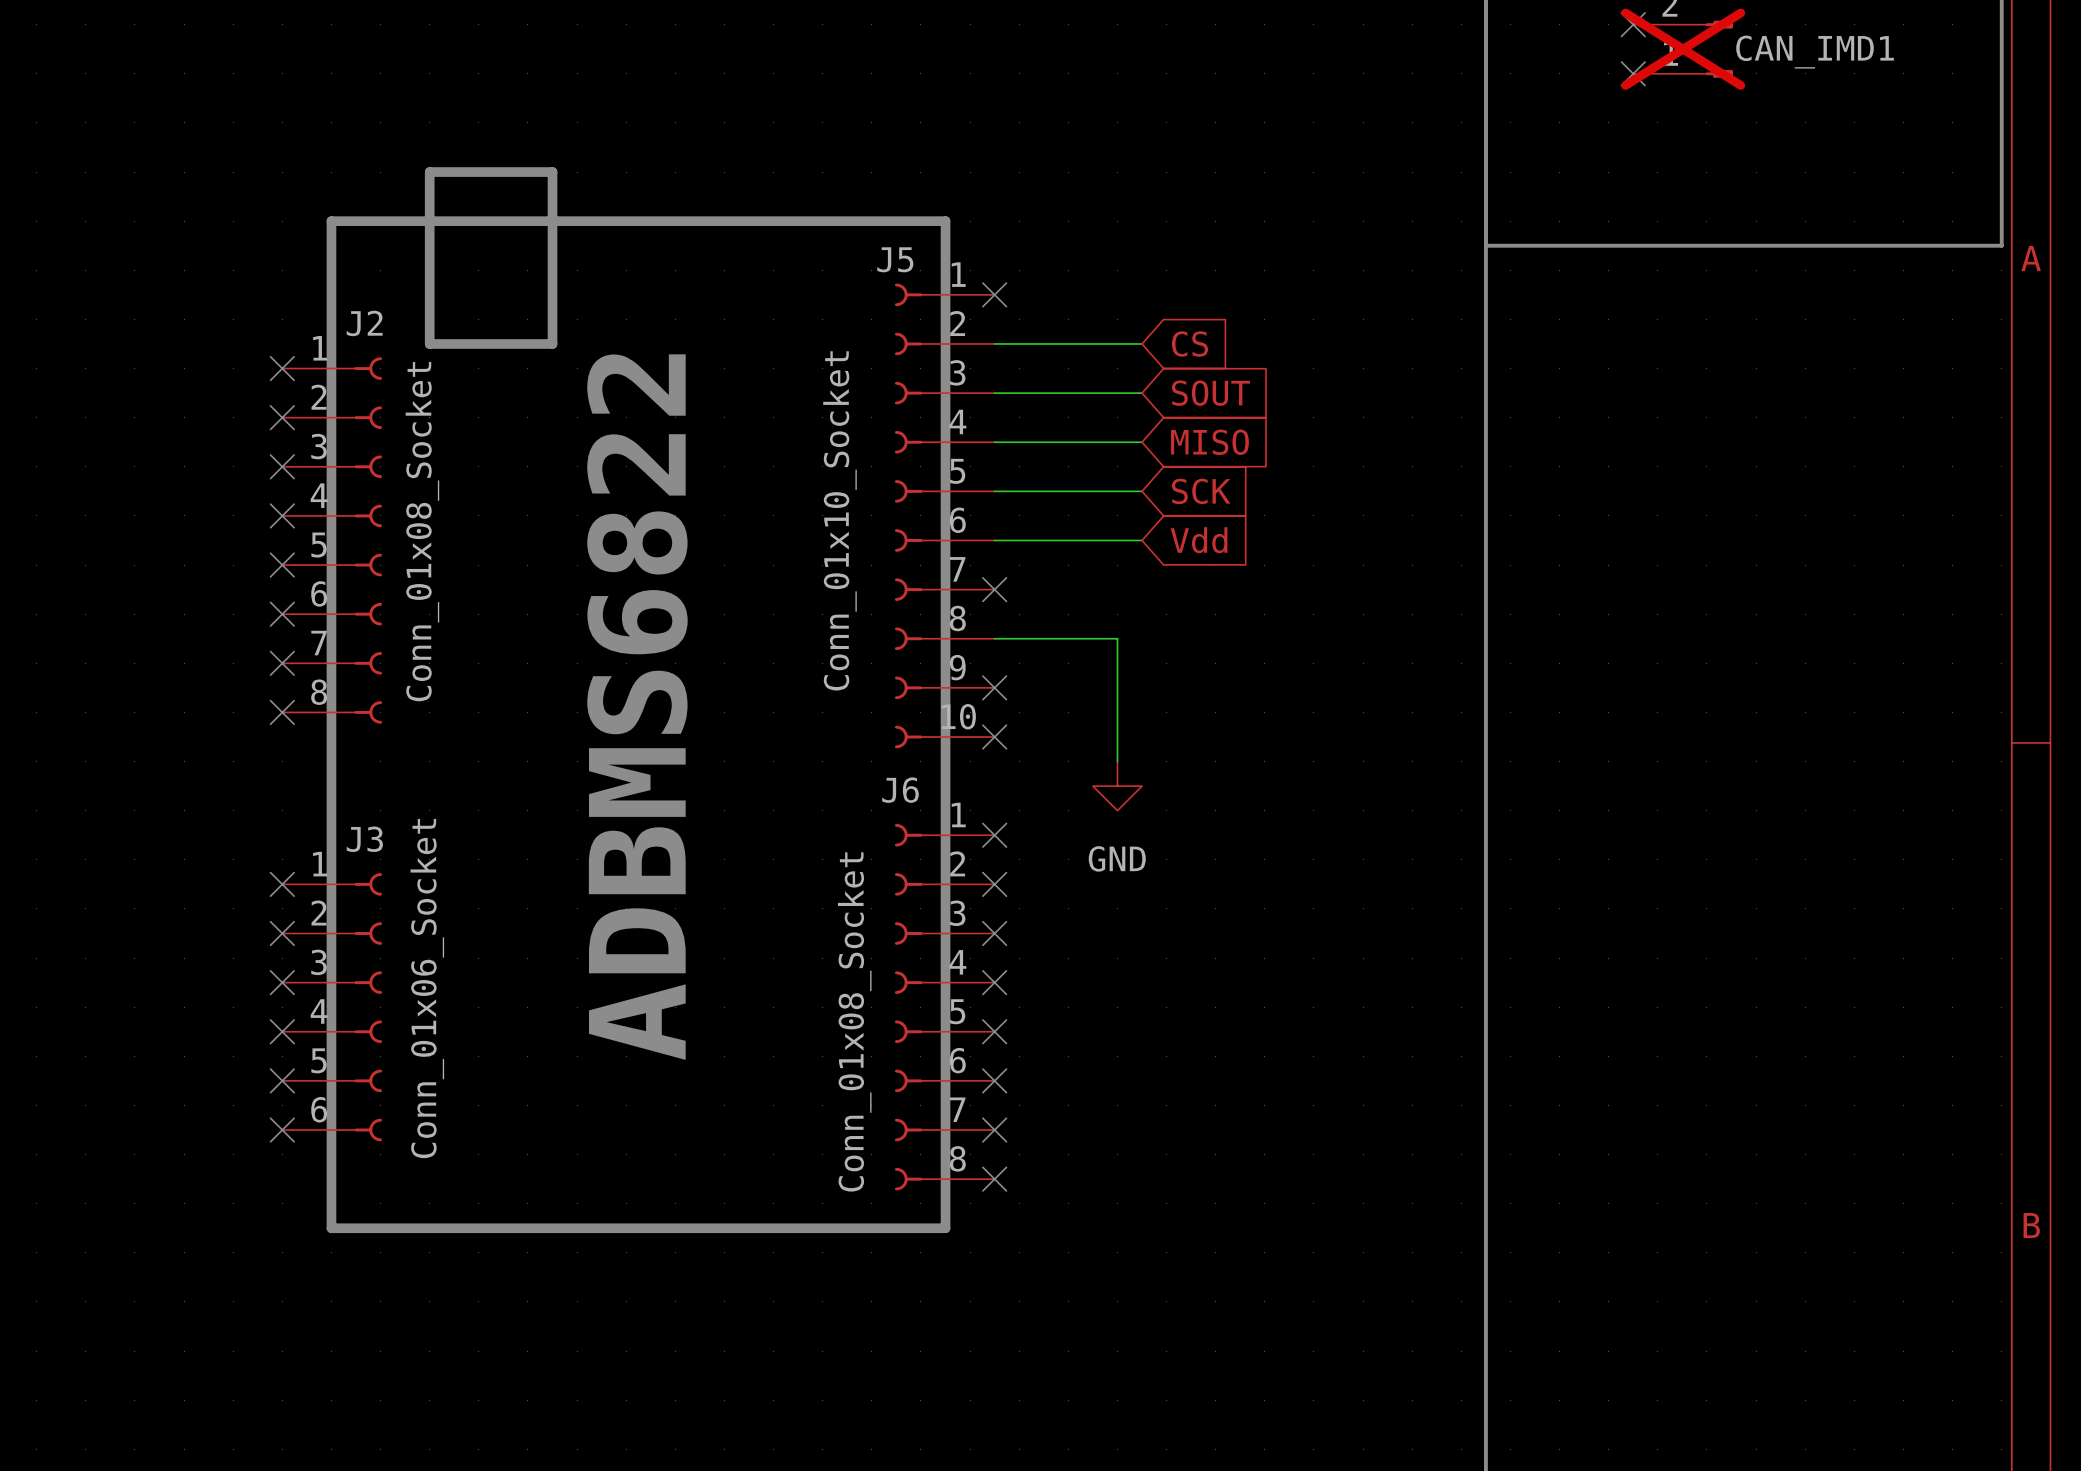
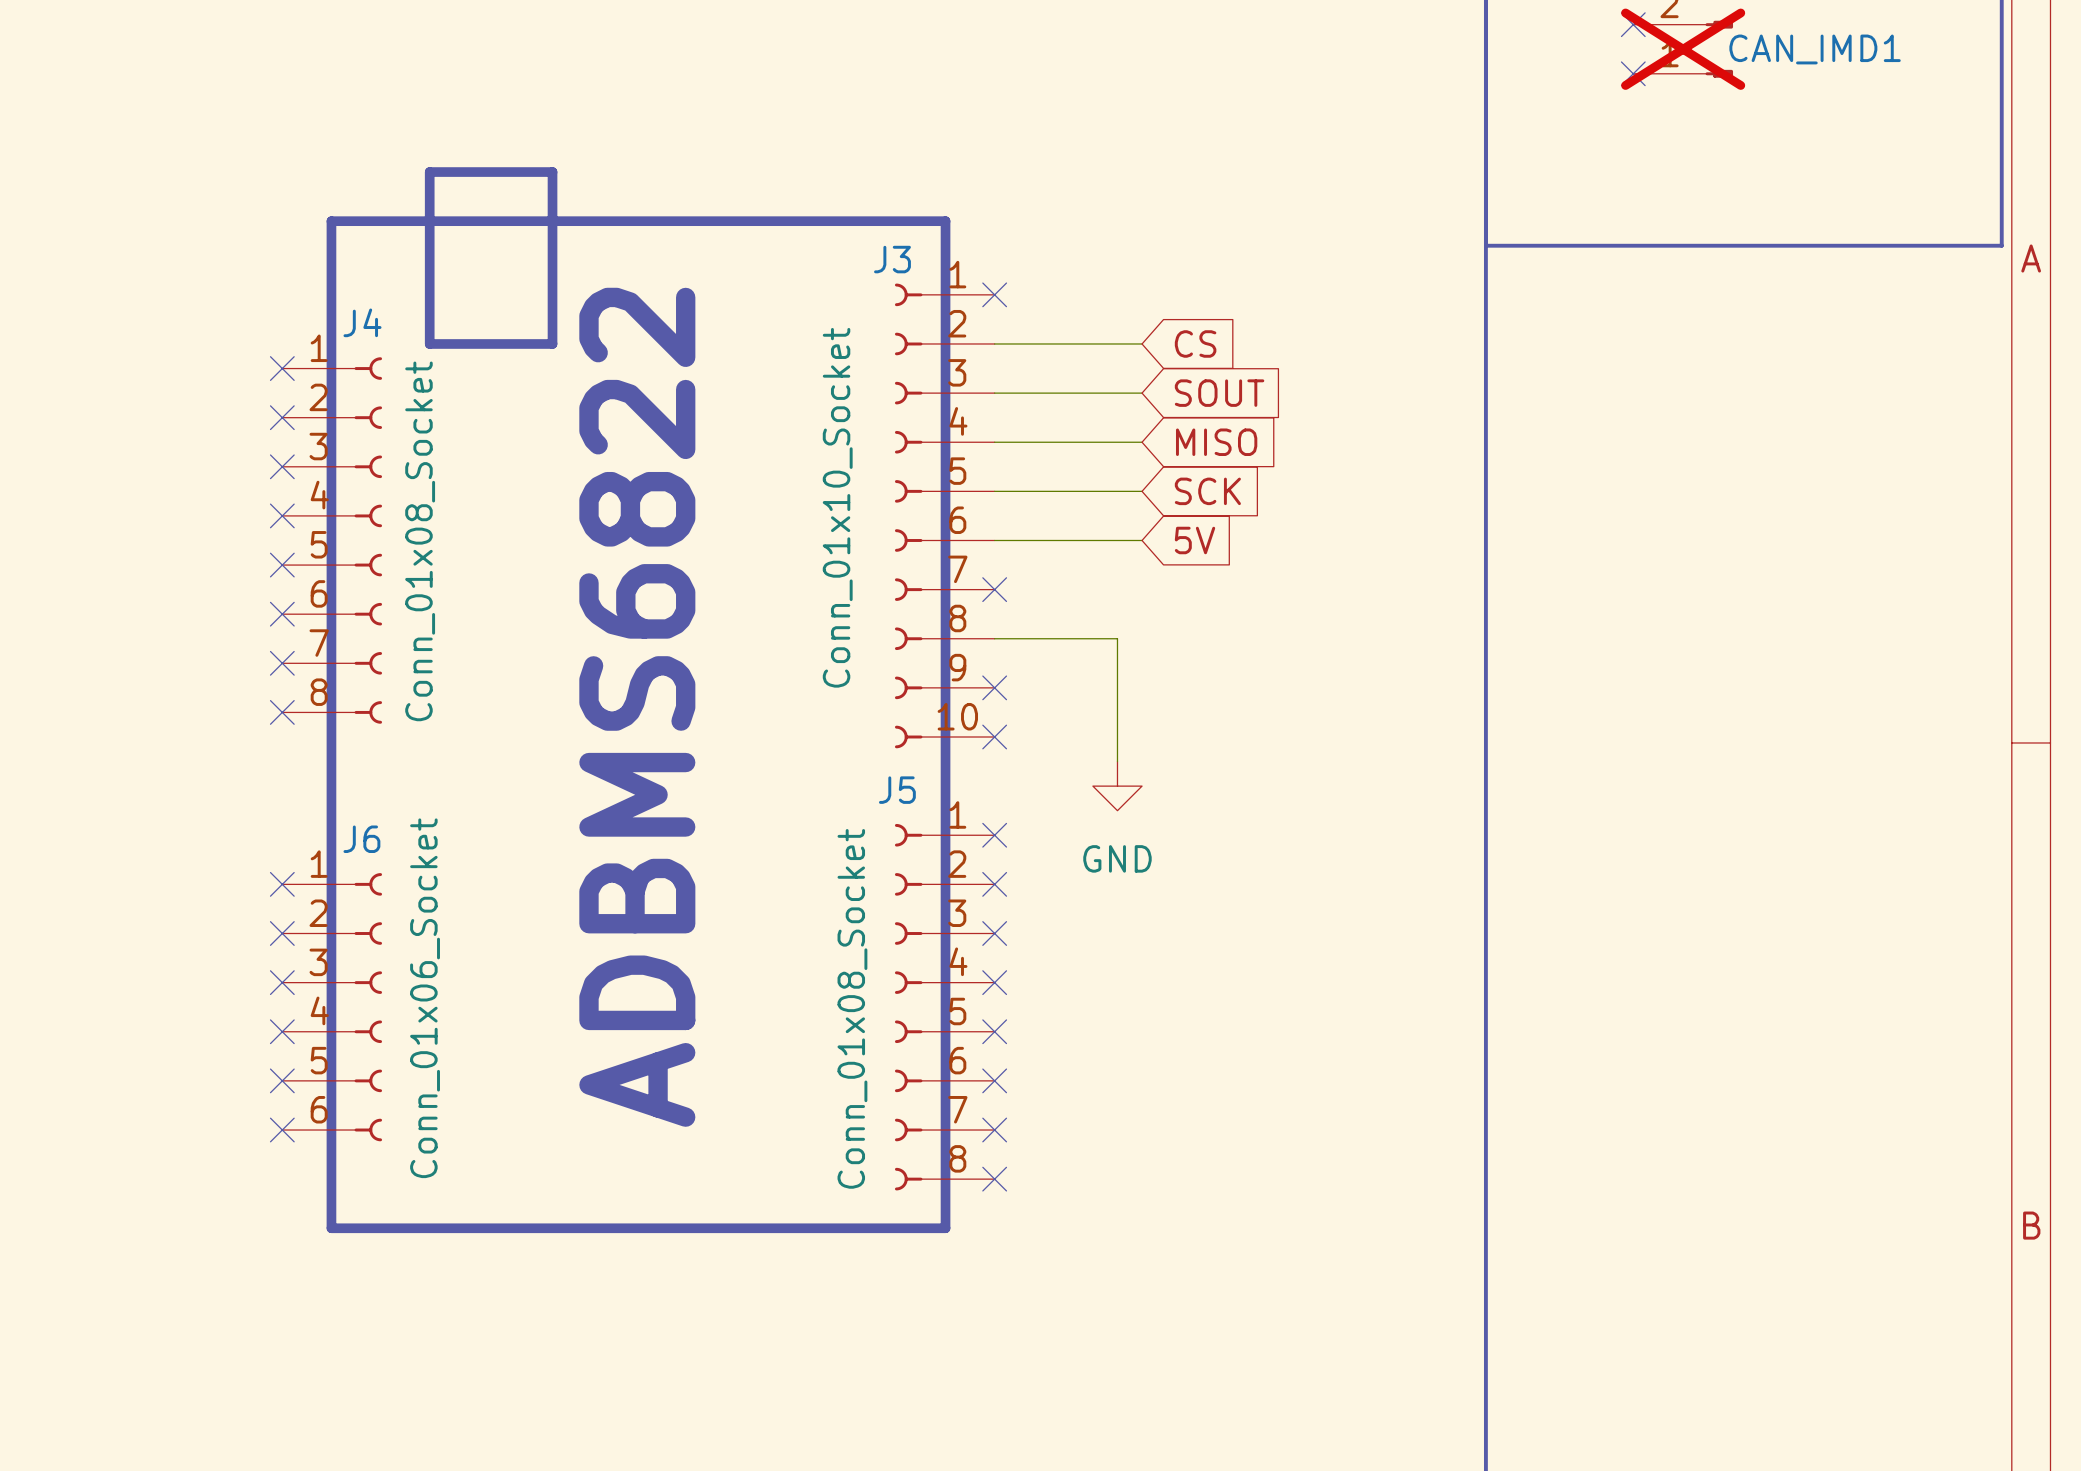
J5 name: J5 (895, 259) -> J3 (892, 259)
J2 name: J2 (364, 323) -> J4 (362, 322)
global label: Vdd (1198, 540) -> 5V (1195, 540)
J6 name: J6 (900, 790) -> J5 (897, 790)
J3 name: J3 (364, 839) -> J6 (361, 839)

